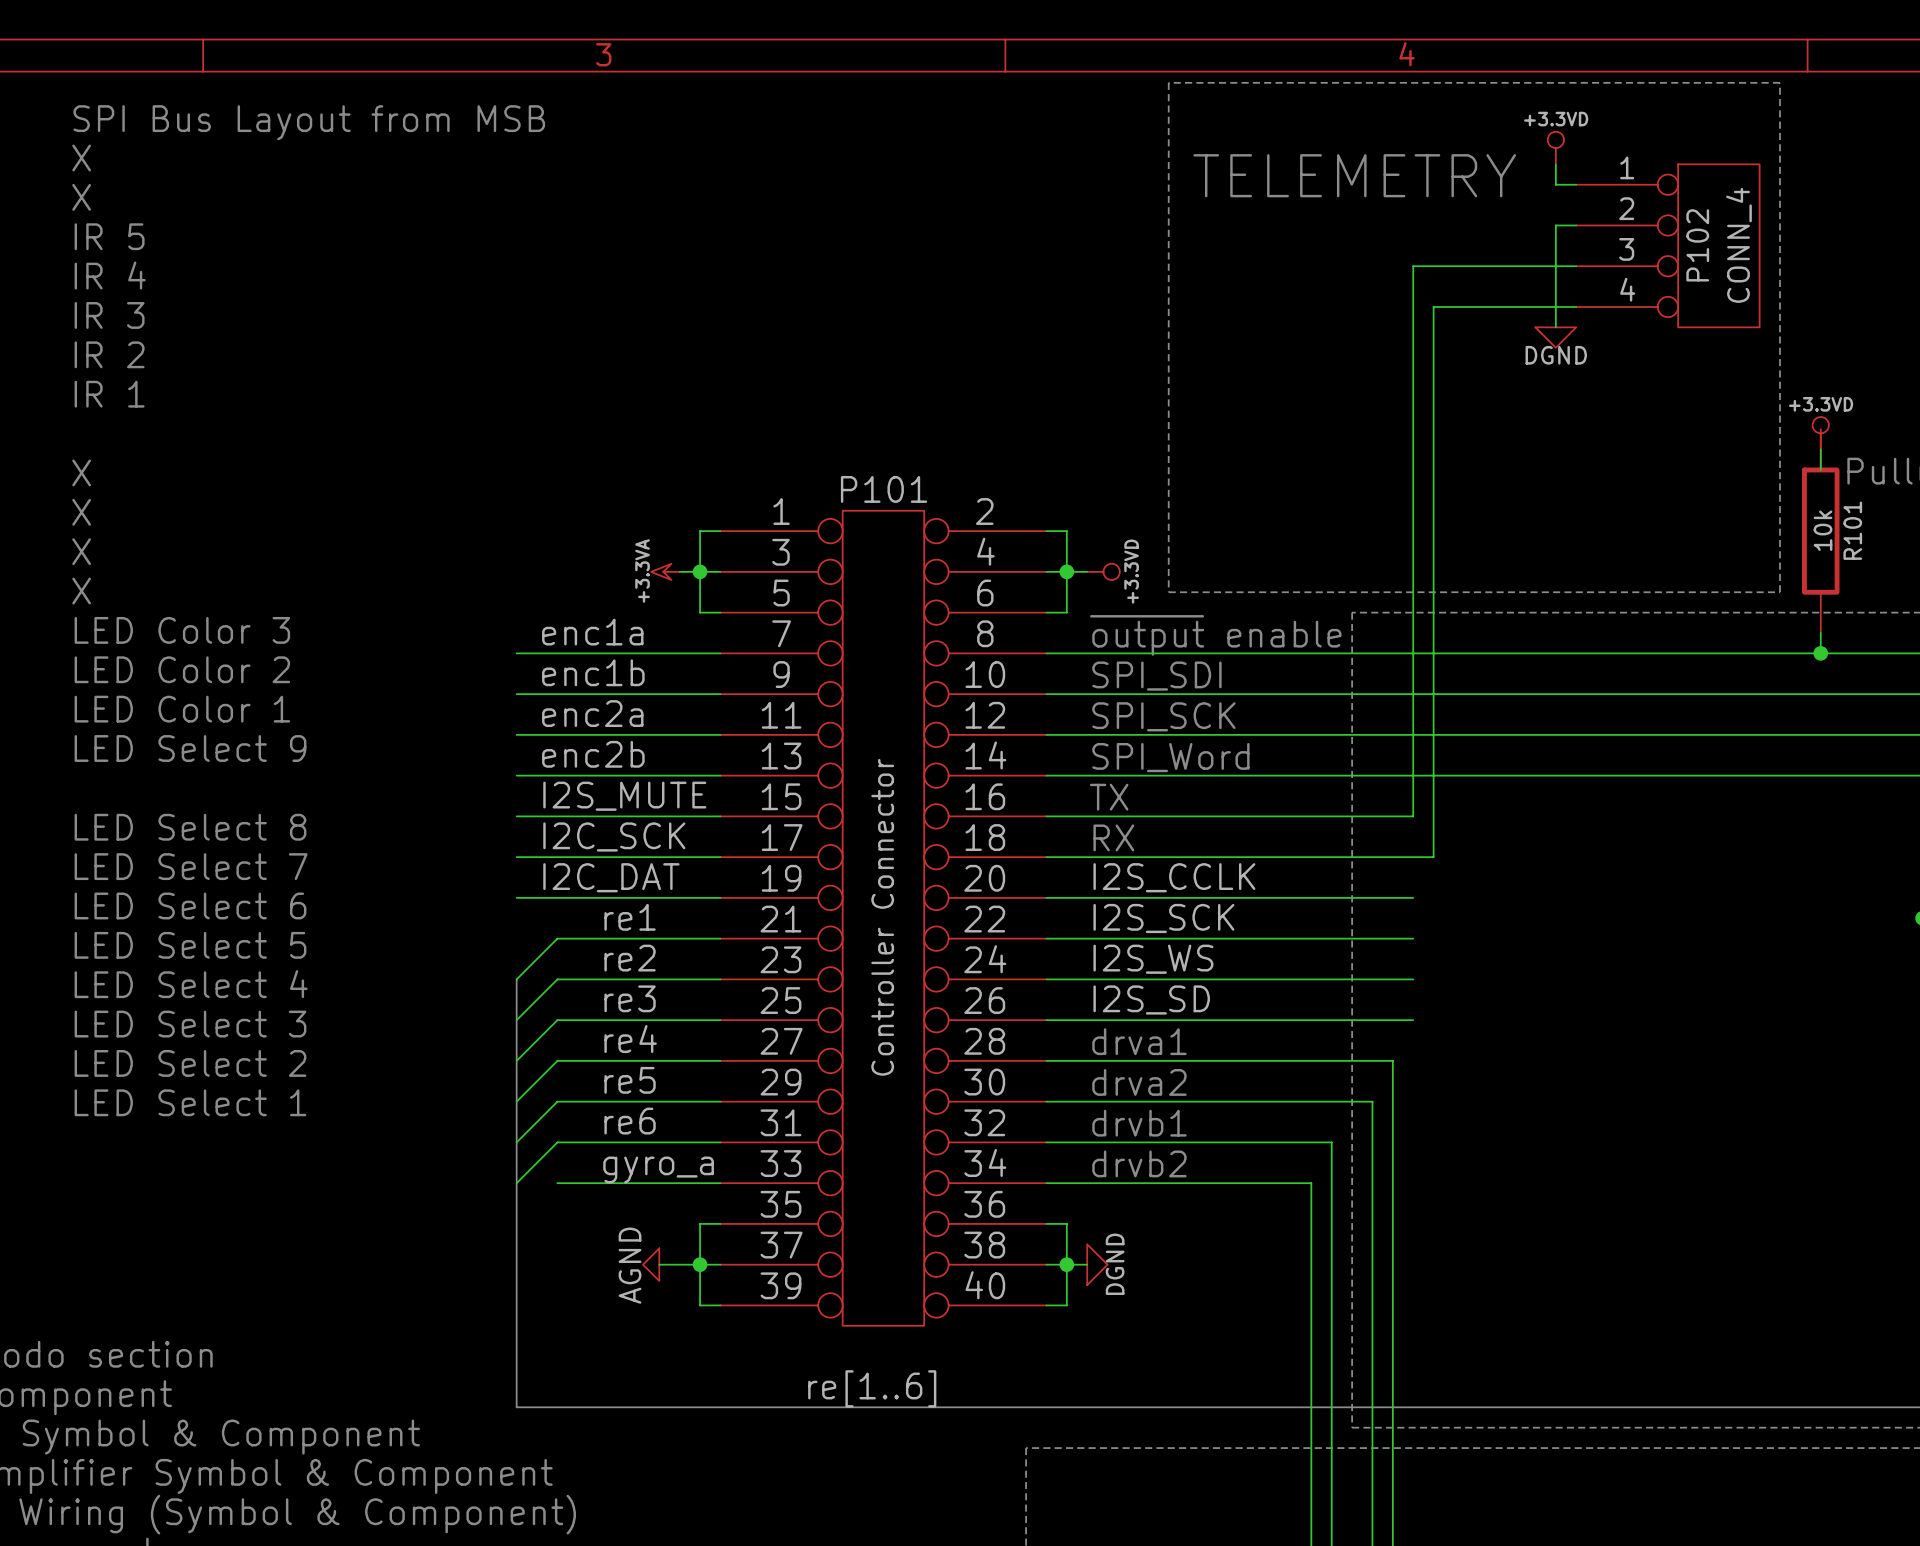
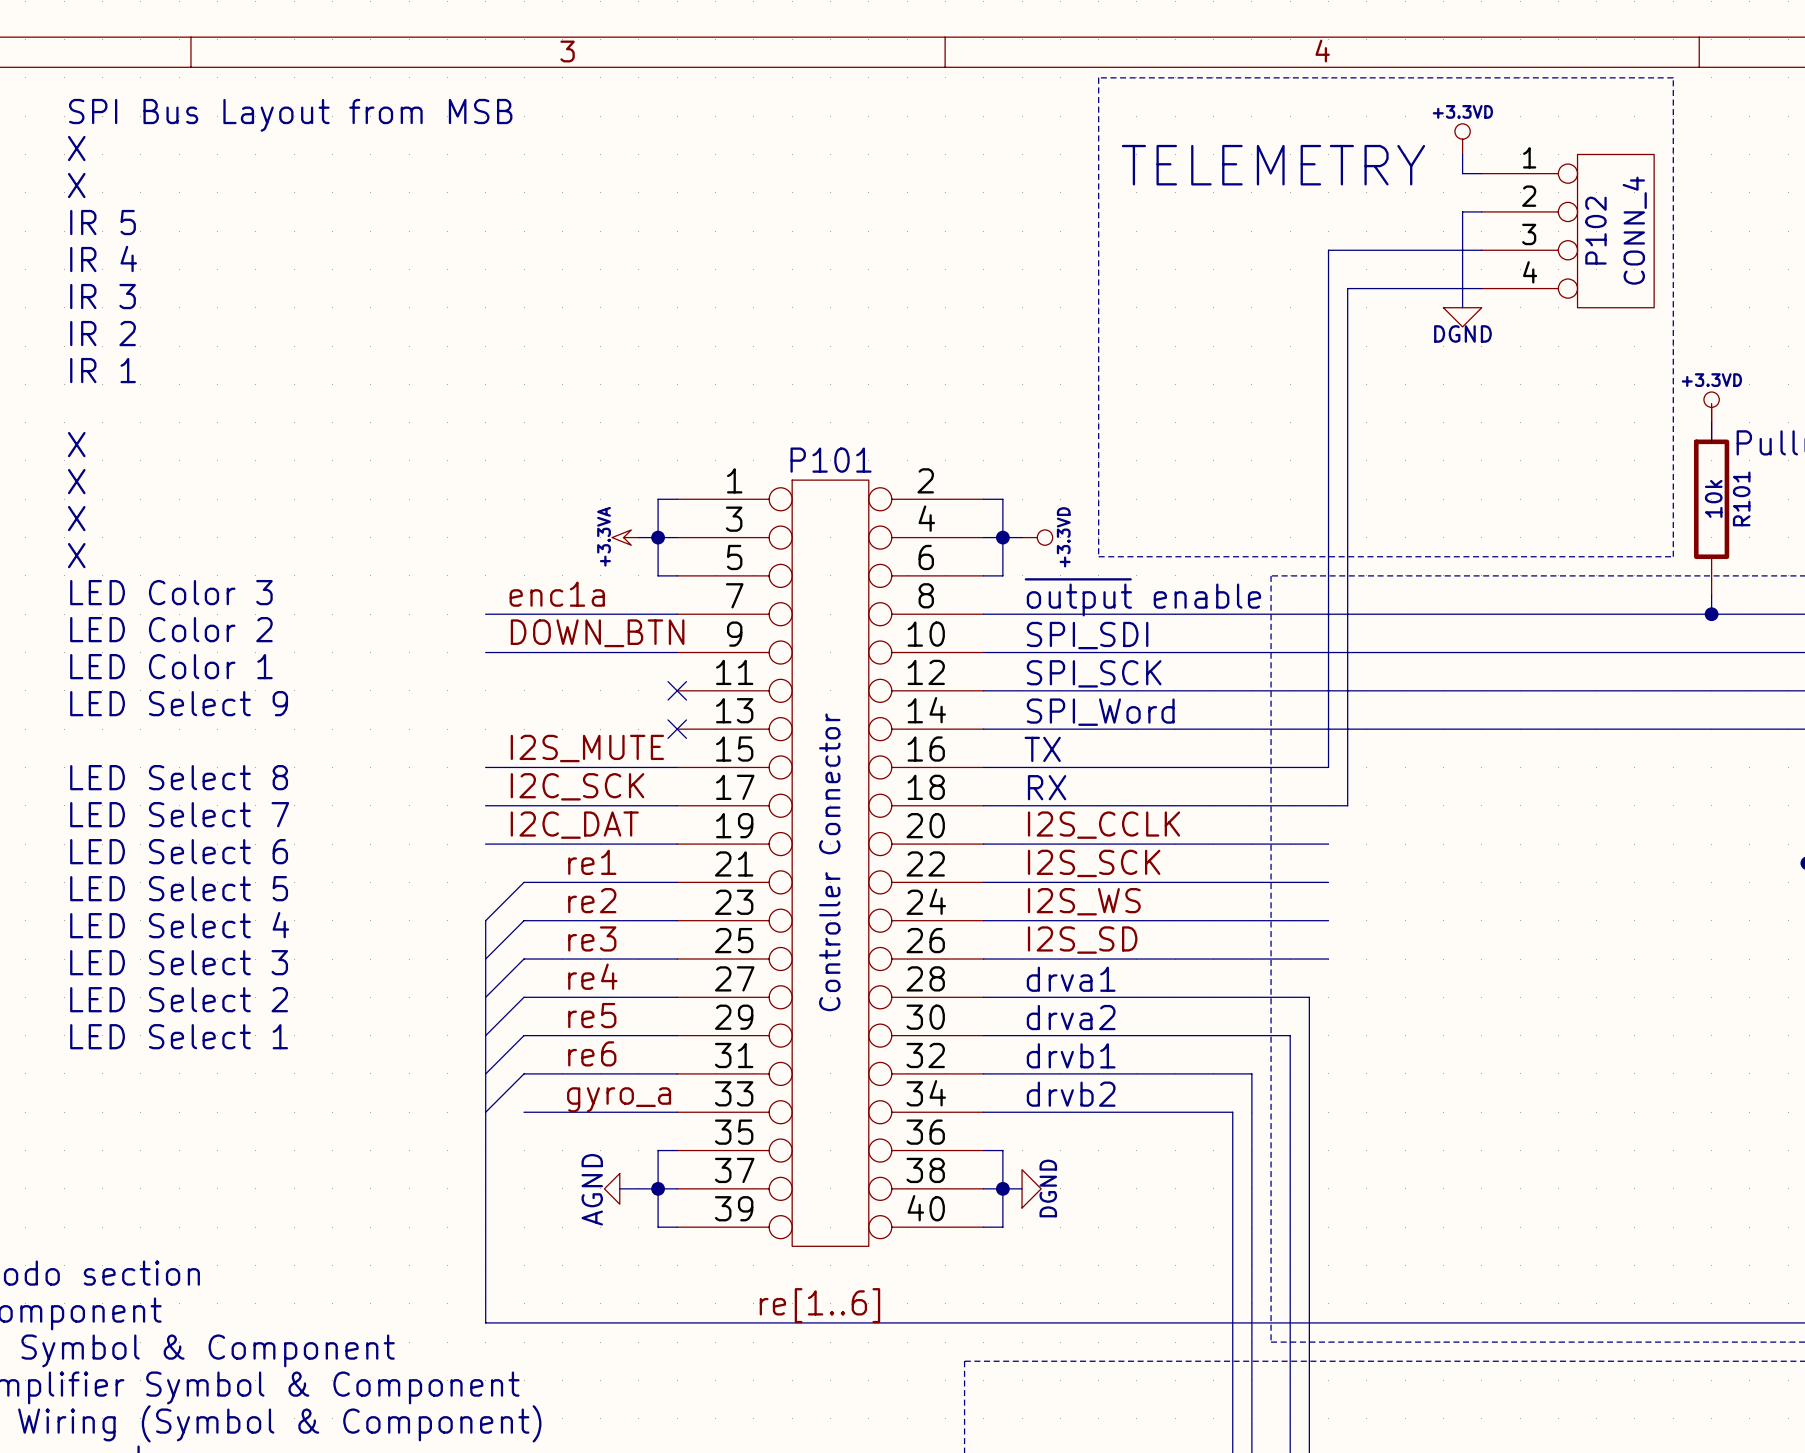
label: enc1b (593, 672) -> DOWN_BTN (597, 633)
label: enc2a (592, 713) -> none
wire: (516, 734) (720, 734) -> none
no-connect mark: none -> (677, 690)
label: enc2b (593, 754) -> none
wire: (516, 775) (720, 775) -> none
no-connect mark: none -> (677, 729)

